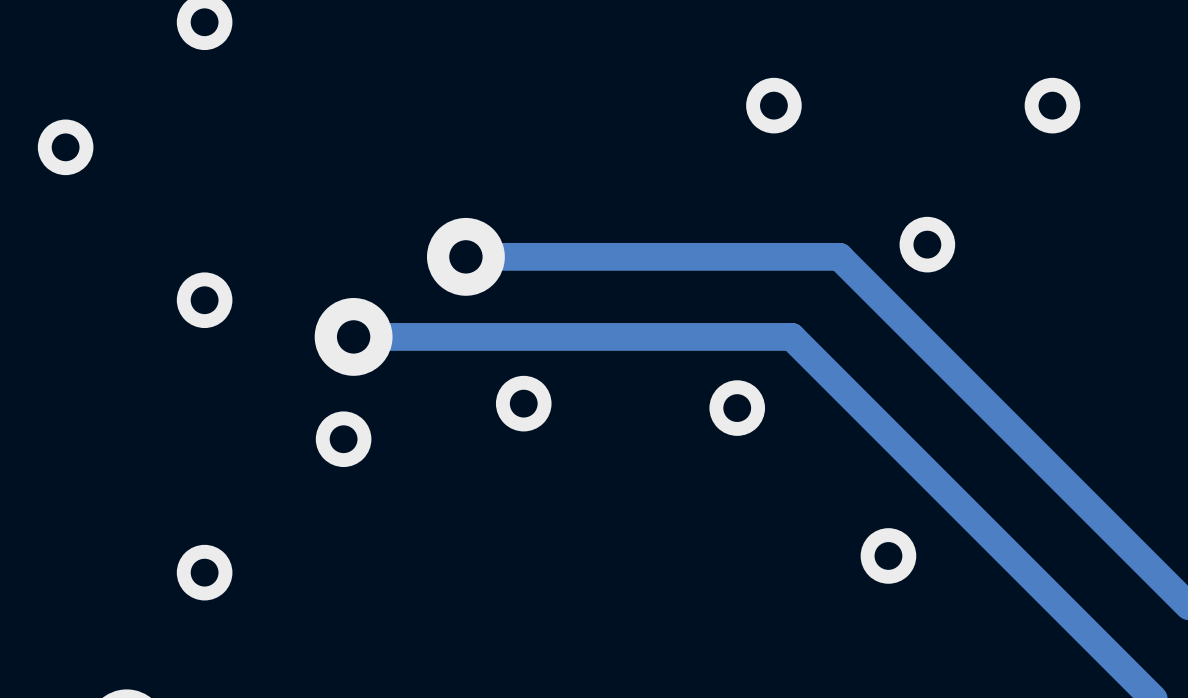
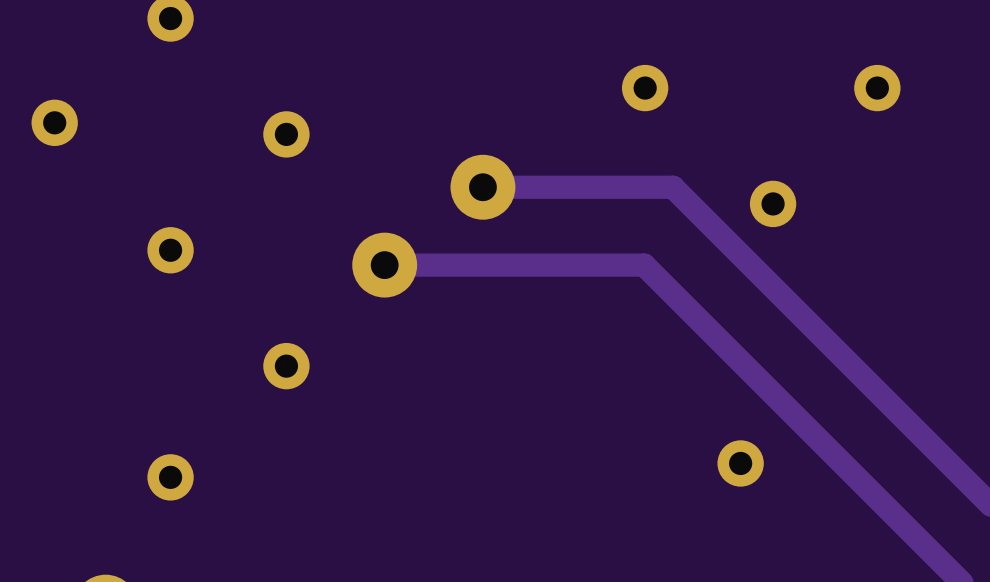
via: none -> (286, 134)
via: none -> (482, 187)
via position: (465, 256) -> (384, 265)
track: (839, 256) (465, 256) -> (699, 214) (672, 187) (482, 187)
via: (353, 336) -> none
track: (791, 336) (353, 336) -> (659, 280) (644, 265) (384, 265)
via: (523, 403) -> none
via: (737, 408) -> none

